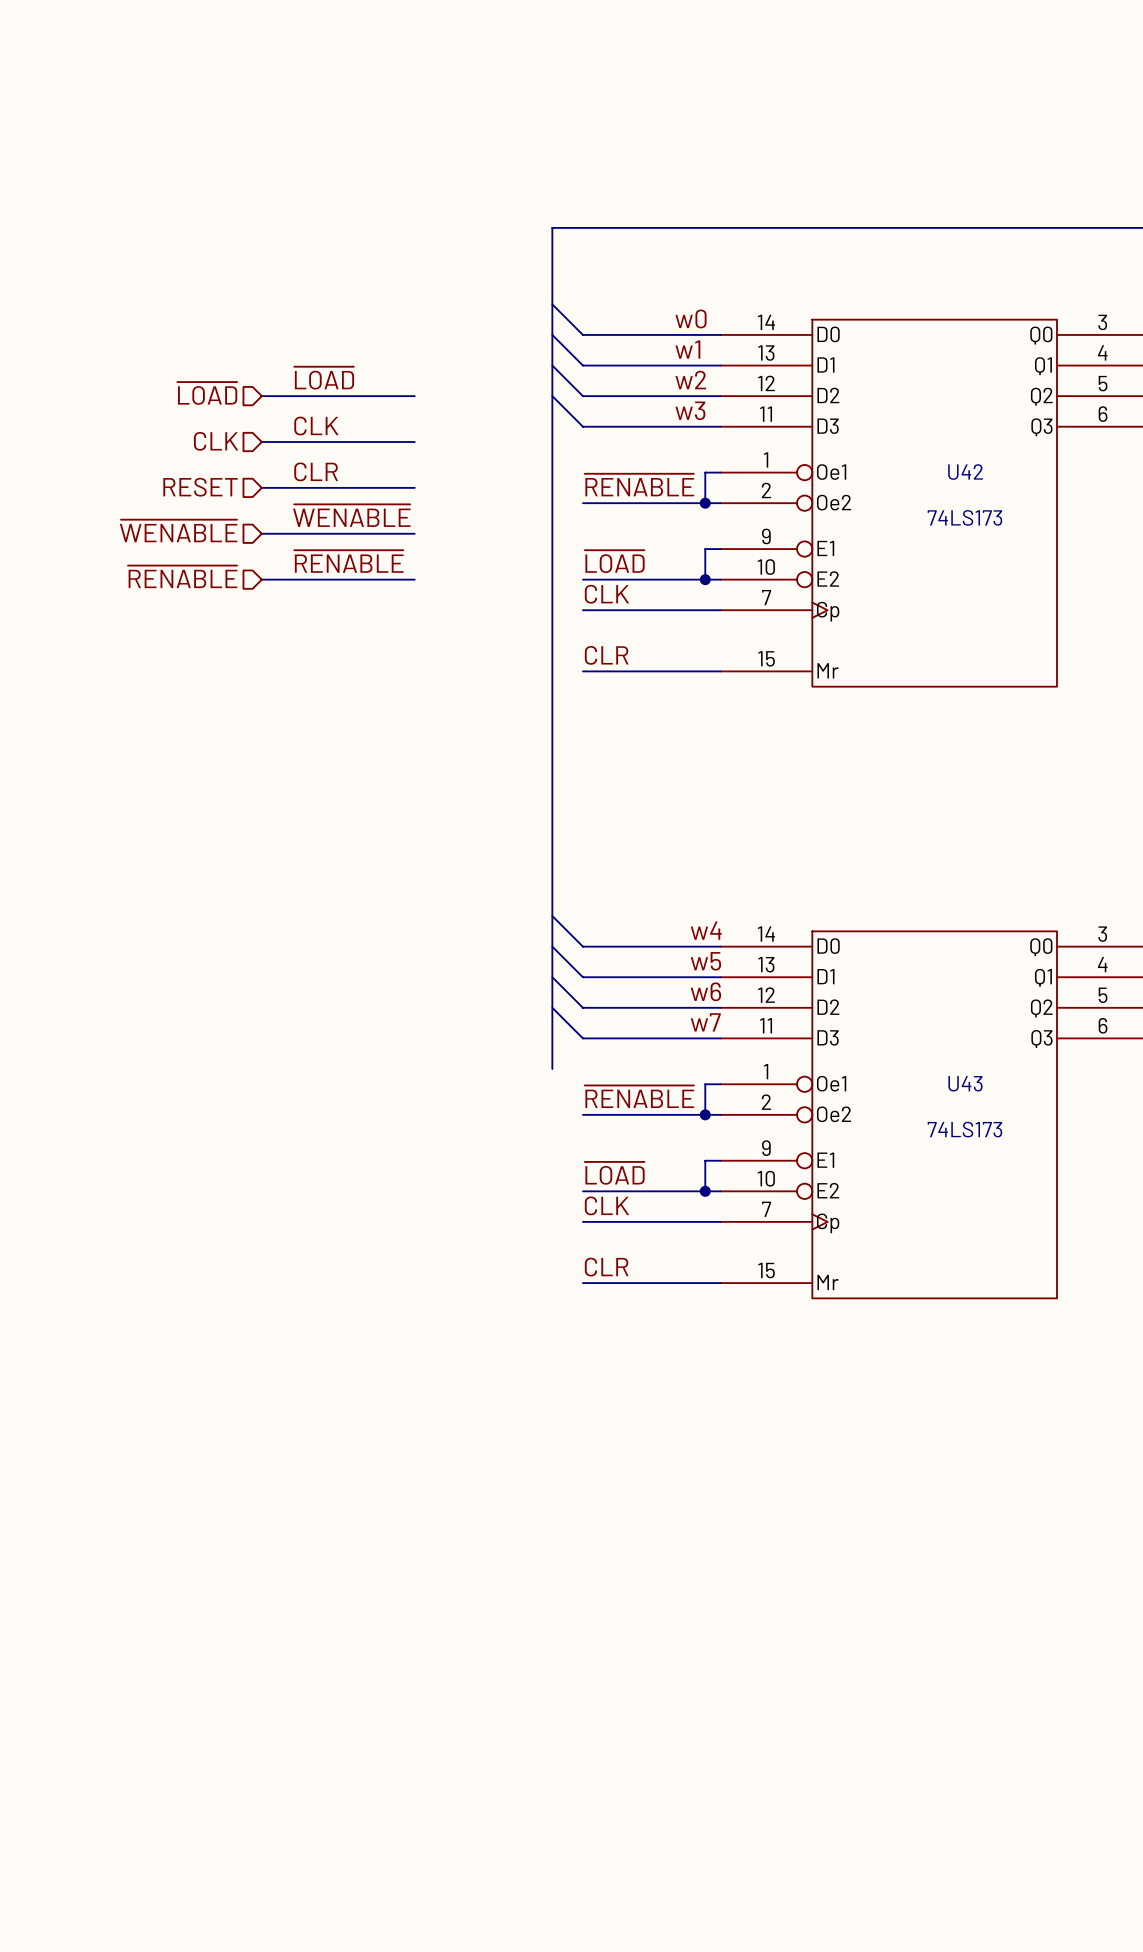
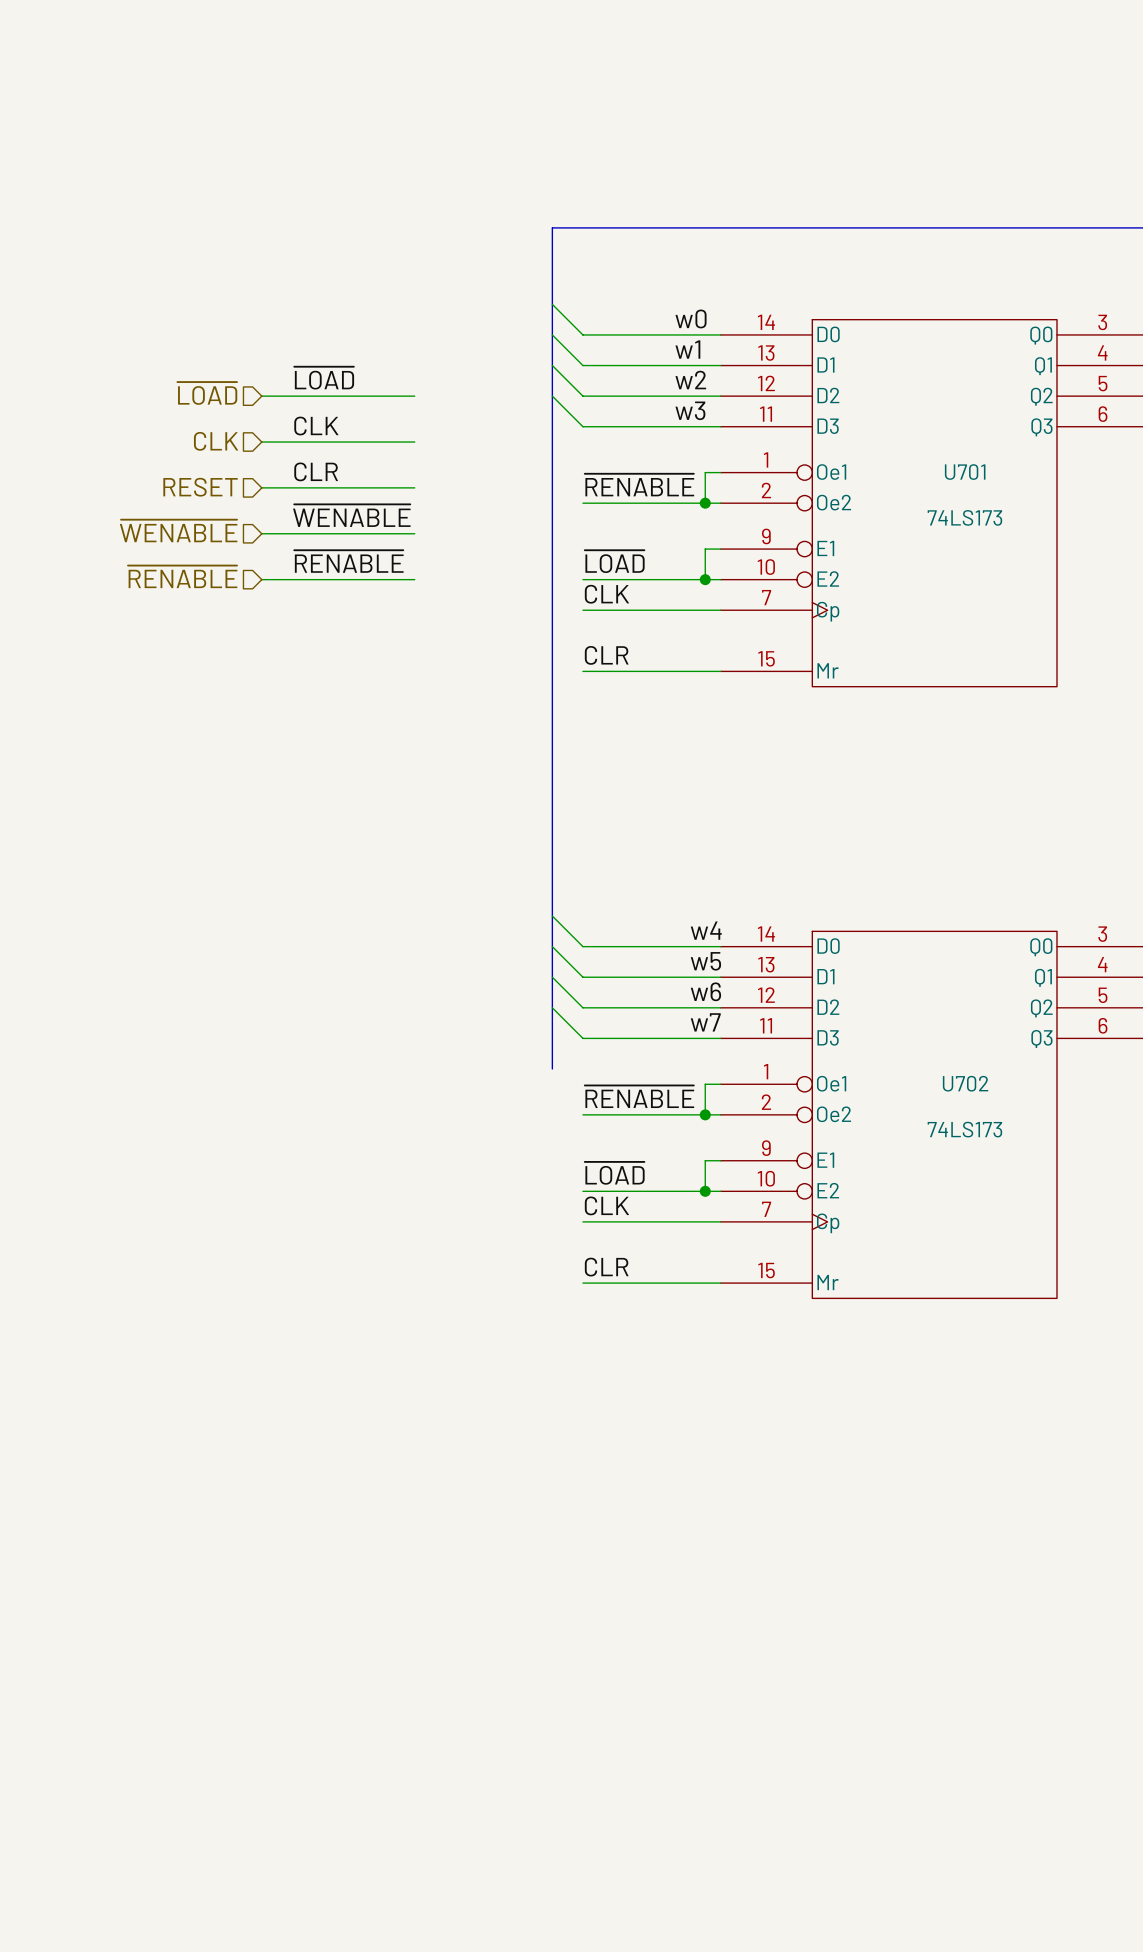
U42 name: U42 (965, 472) -> U701 (965, 472)
U43 name: U43 (965, 1083) -> U702 (965, 1083)

